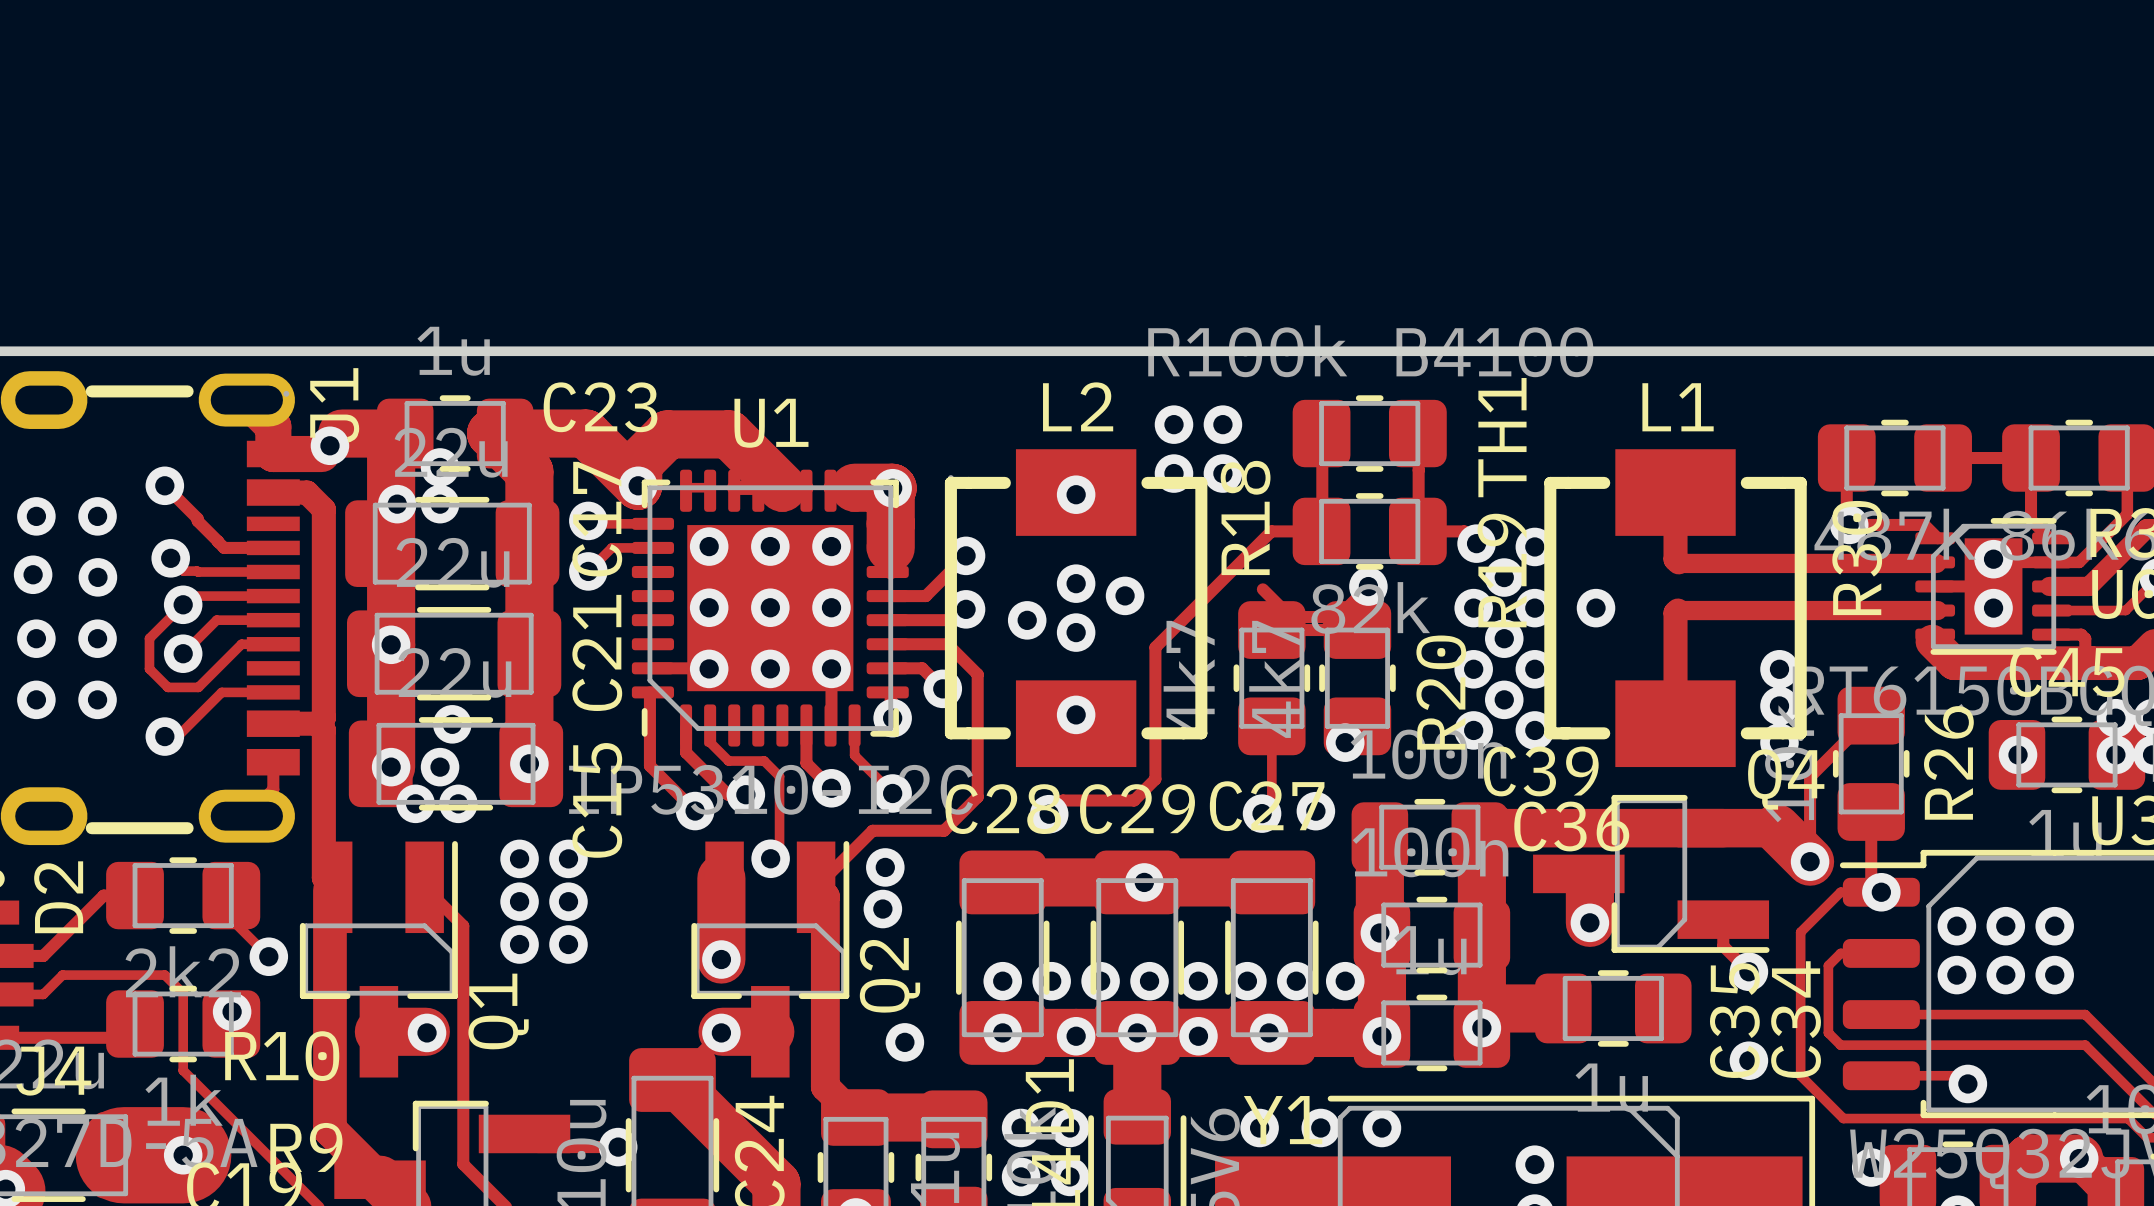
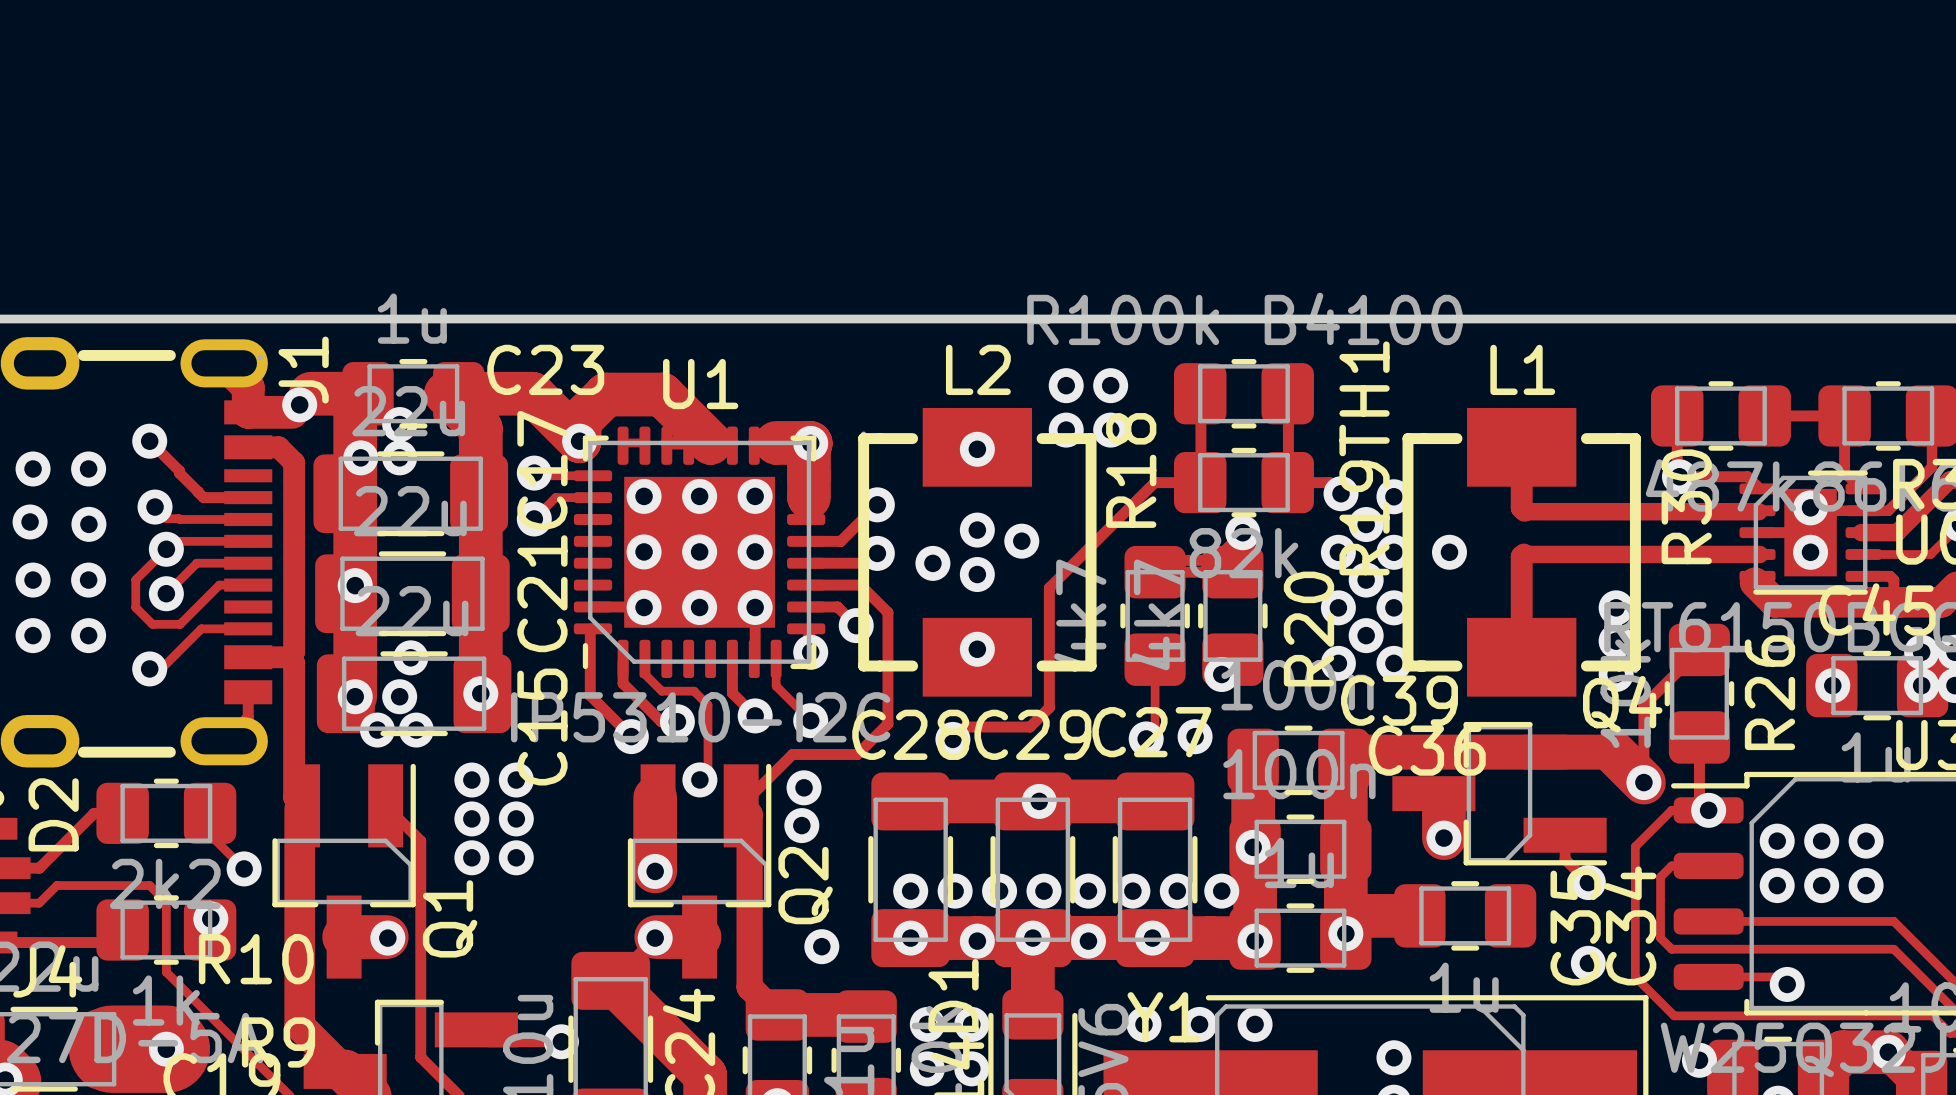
track: (1262, 589) (1290, 617) -> none

